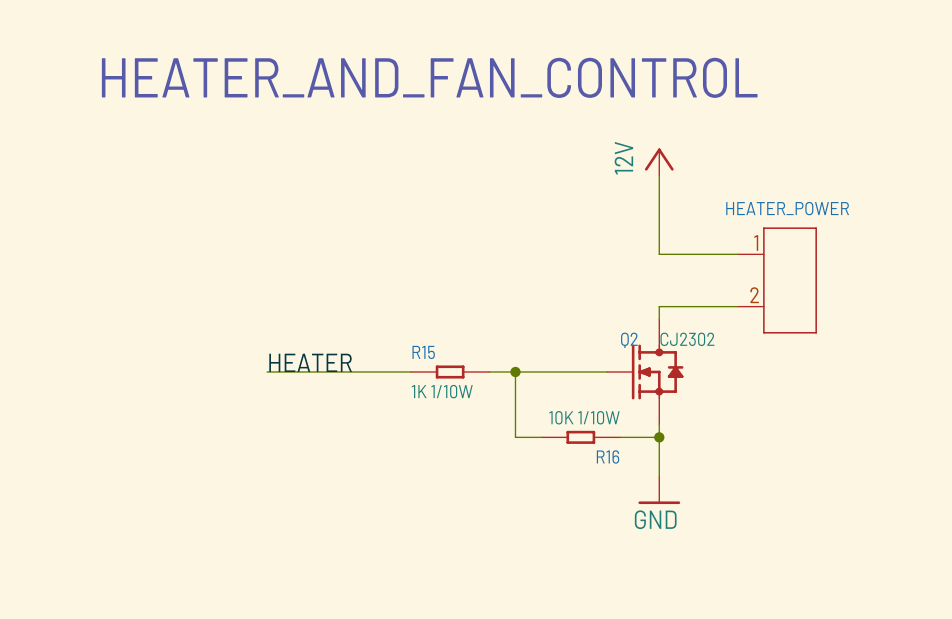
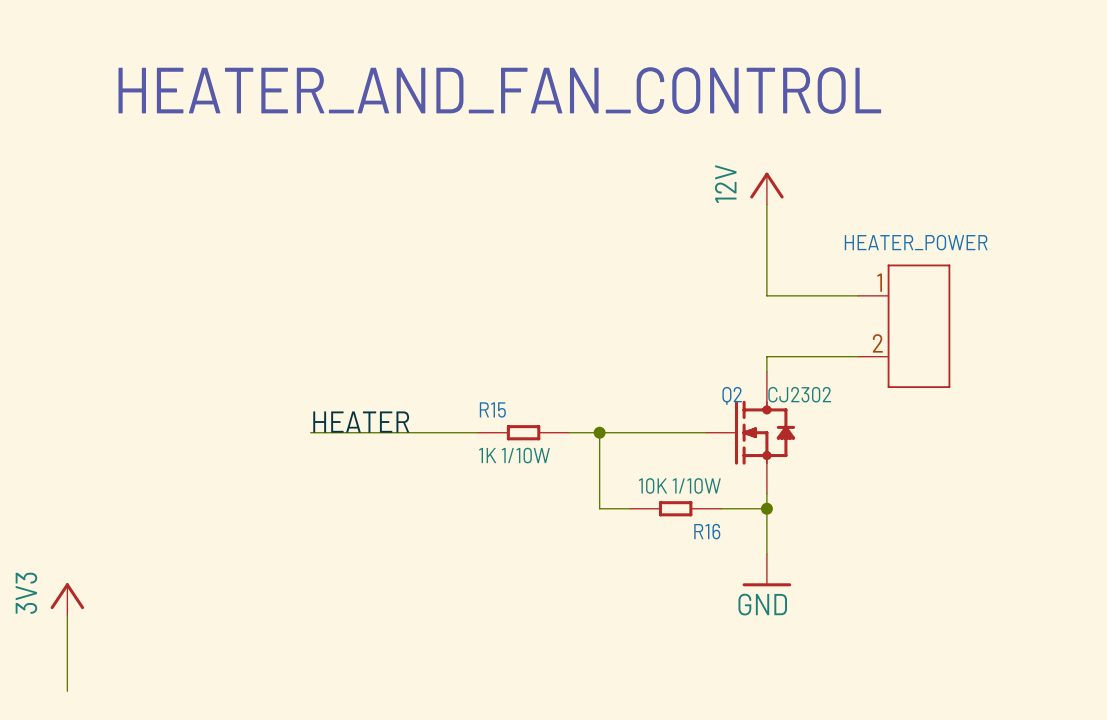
power symbol: none -> 3V3 (67, 599)
wire: none -> (67, 615) (67, 691)

